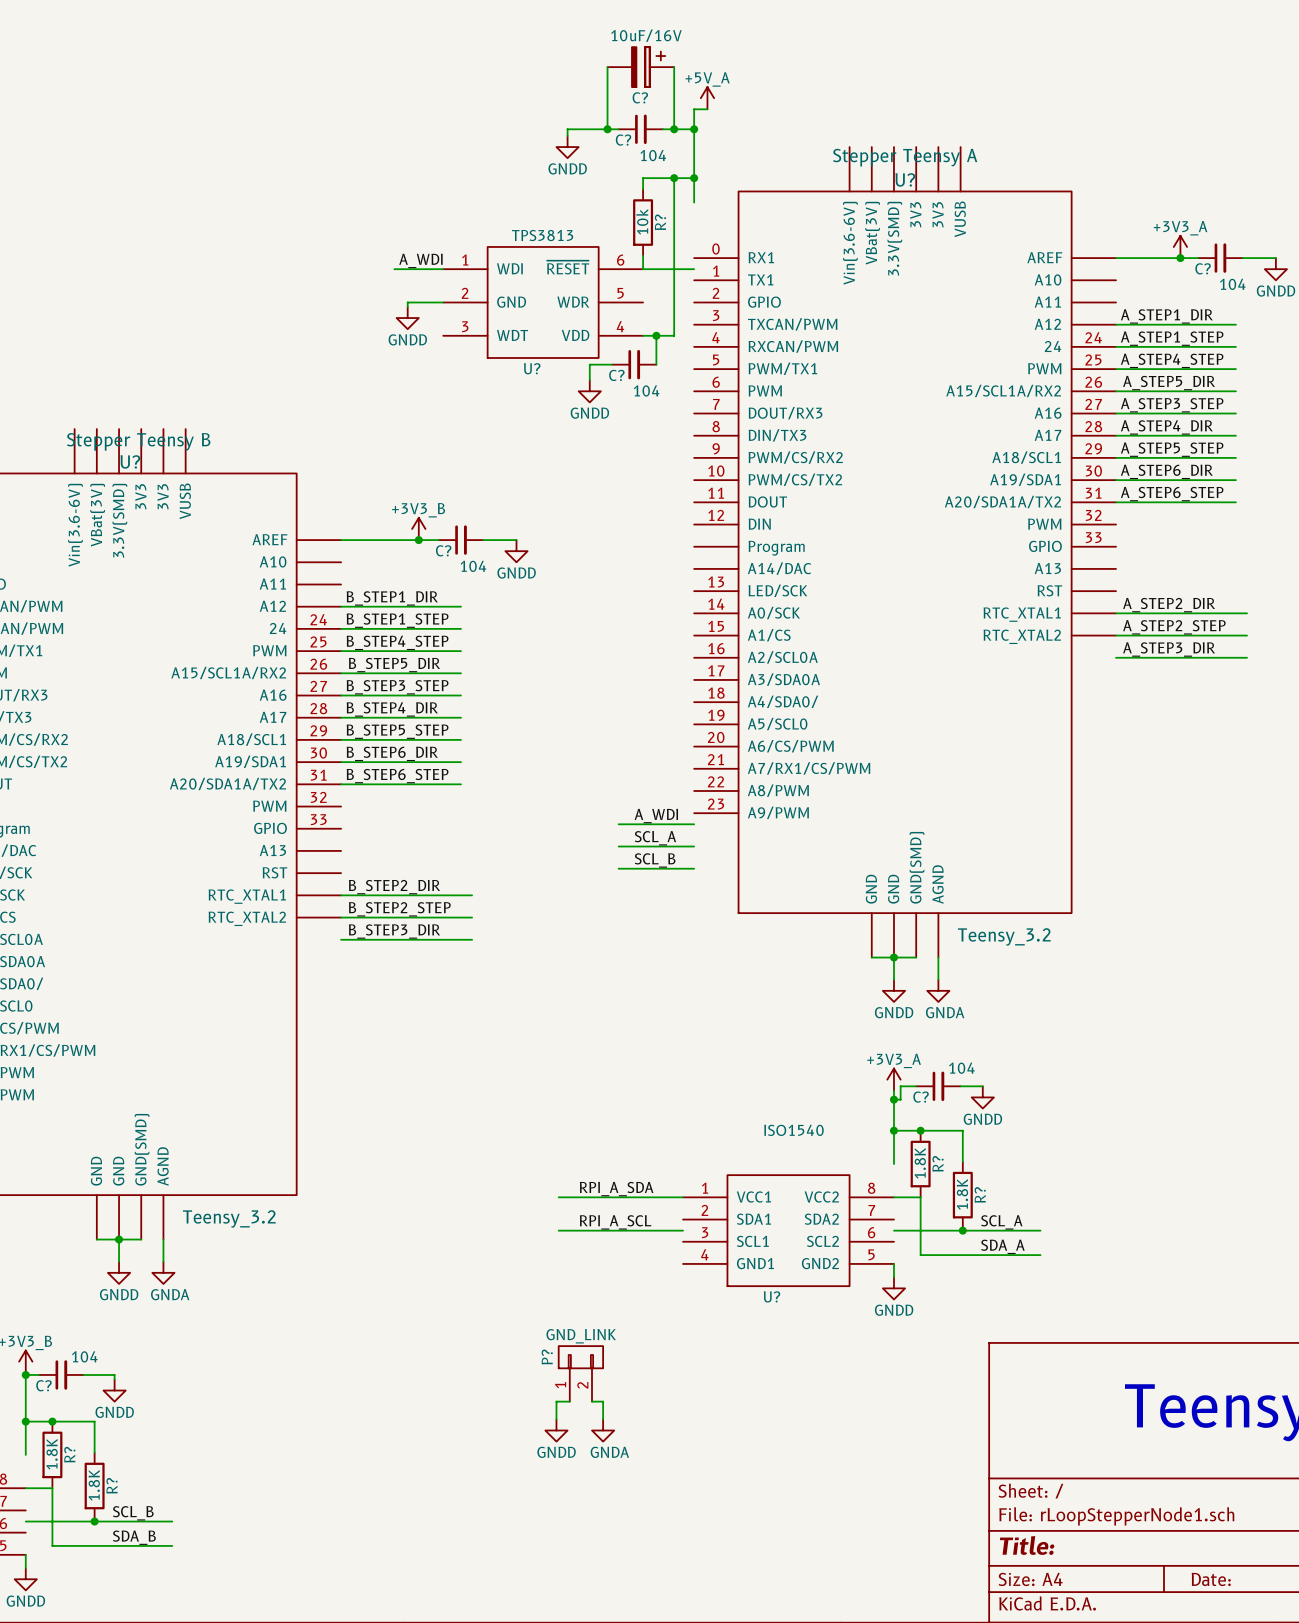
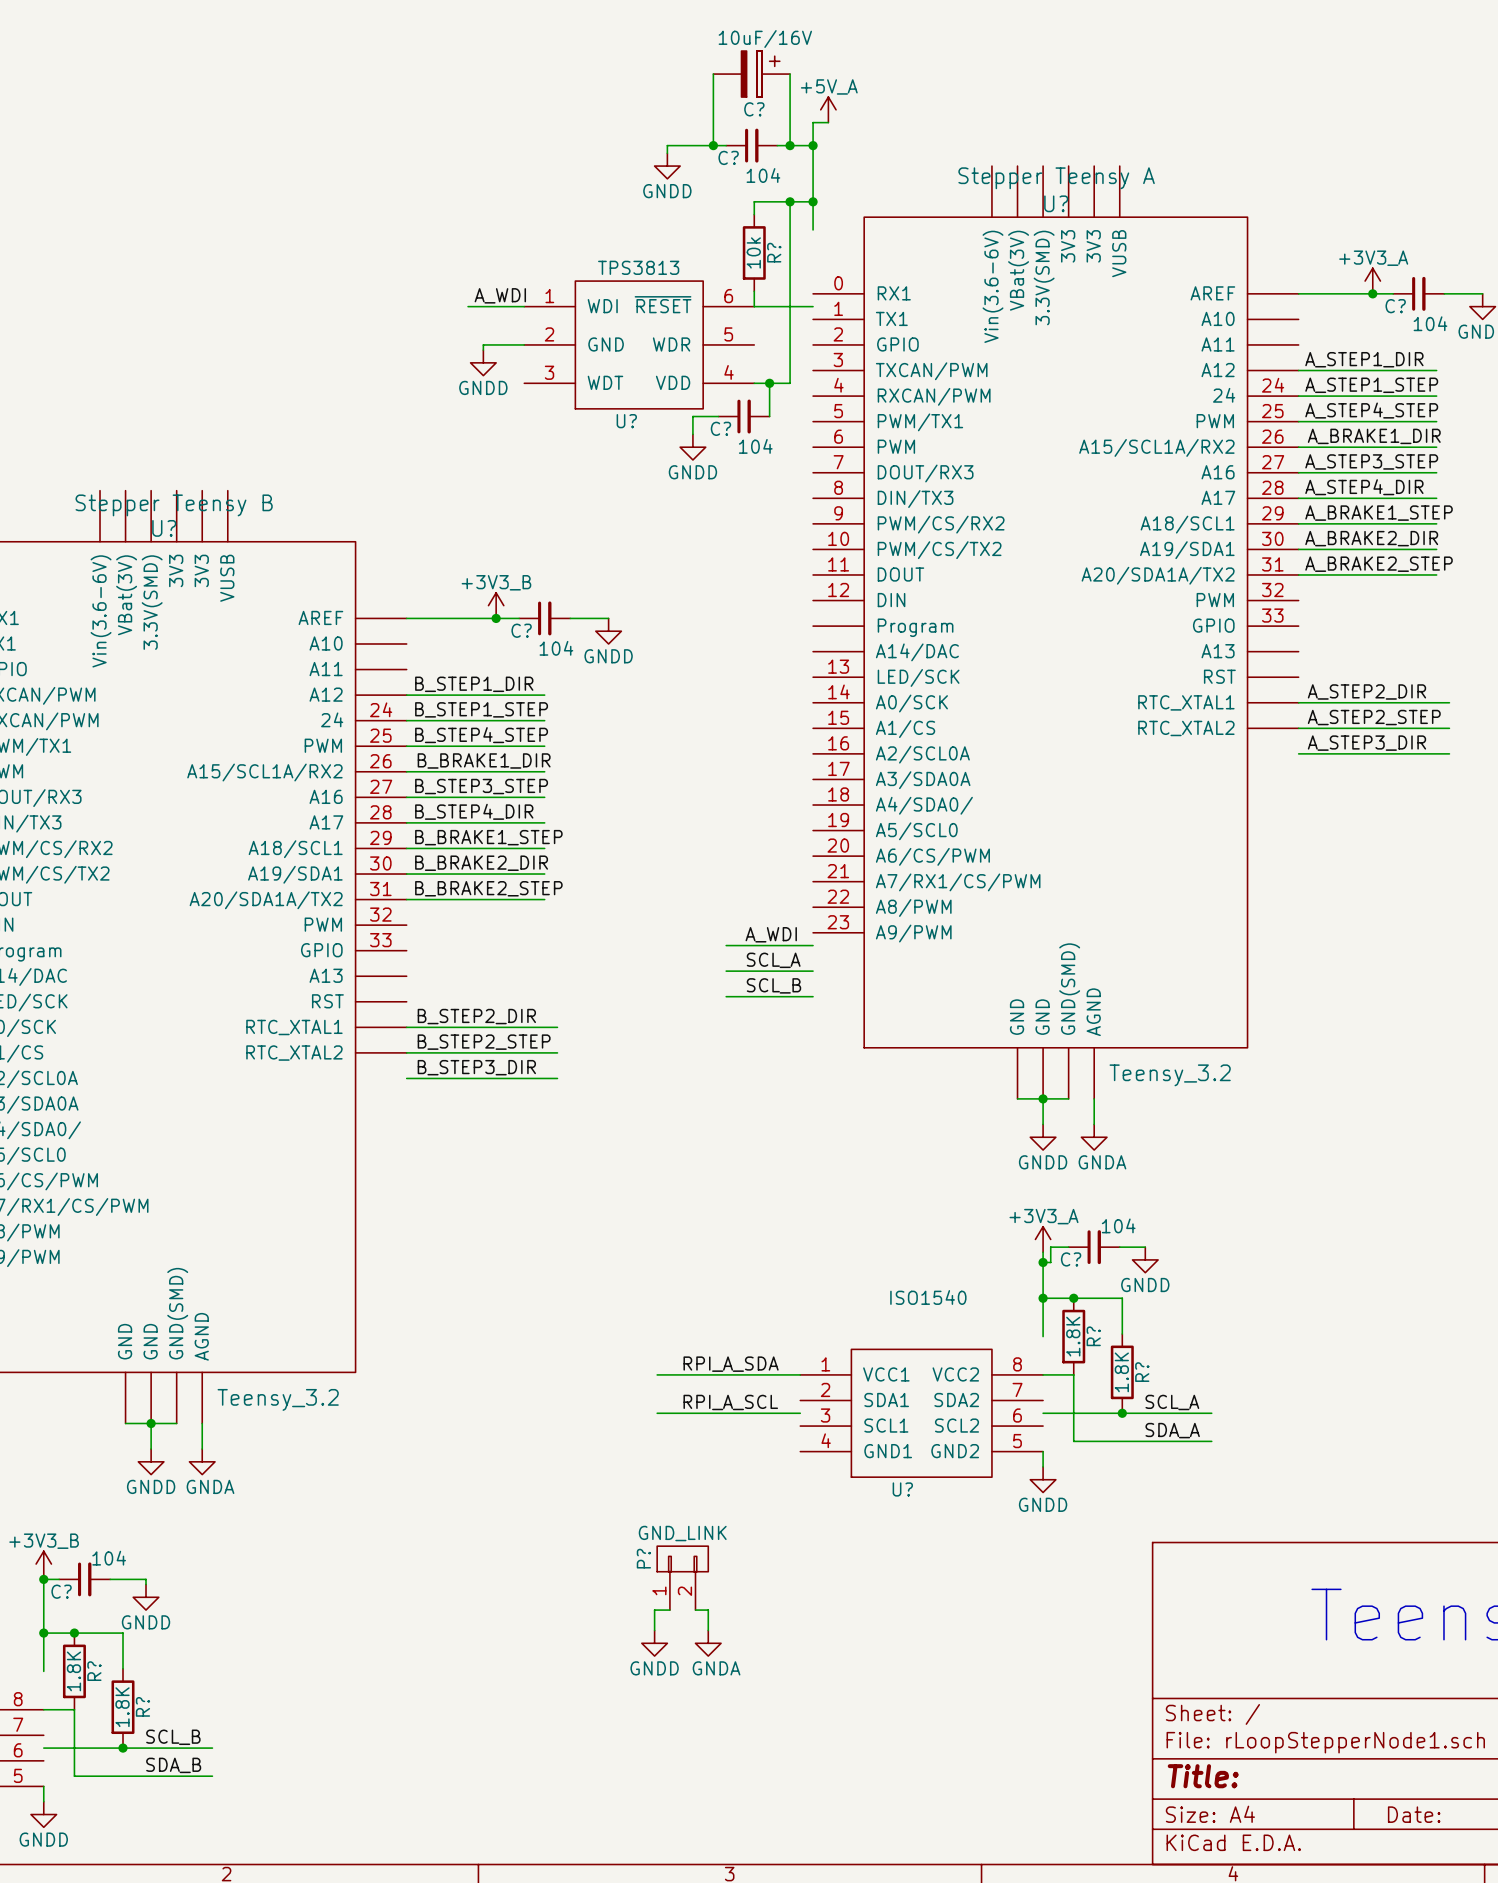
label: A_STEP5_DIR (1169, 383) -> A_BRAKE1_DIR (1374, 436)
label: A_STEP5_STEP (1172, 449) -> A_BRAKE1_STEP (1379, 513)
label: A_STEP6_DIR (1166, 471) -> A_BRAKE2_DIR (1371, 538)
label: A_STEP6_STEP (1172, 494) -> A_BRAKE2_STEP (1379, 564)
label: B_STEP5_DIR (394, 665) -> B_BRAKE1_DIR (484, 760)
label: B_STEP5_STEP (397, 731) -> B_BRAKE1_STEP (488, 837)
label: B_STEP6_DIR (392, 753) -> B_BRAKE2_DIR (481, 863)
label: B_STEP6_STEP (397, 776) -> B_BRAKE2_STEP (488, 888)

